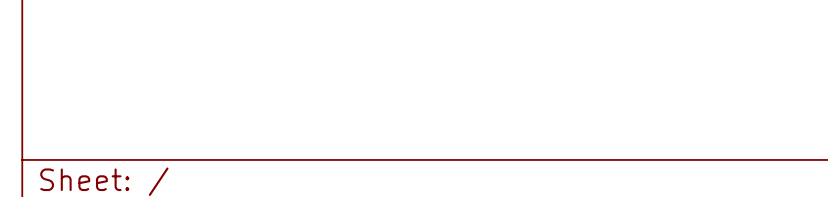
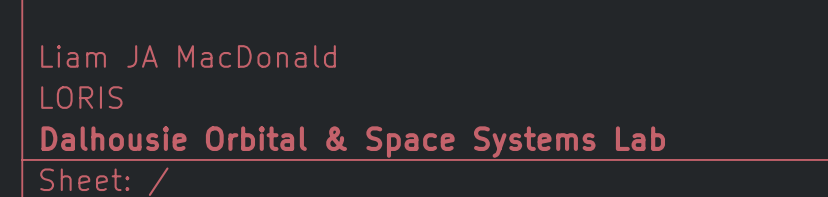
title block: none -> Liam JA MacDonald (188, 56)
title block: none -> LORIS (81, 97)
title block: none -> Dalhousie Orbital & Space Systems Lab (353, 142)

